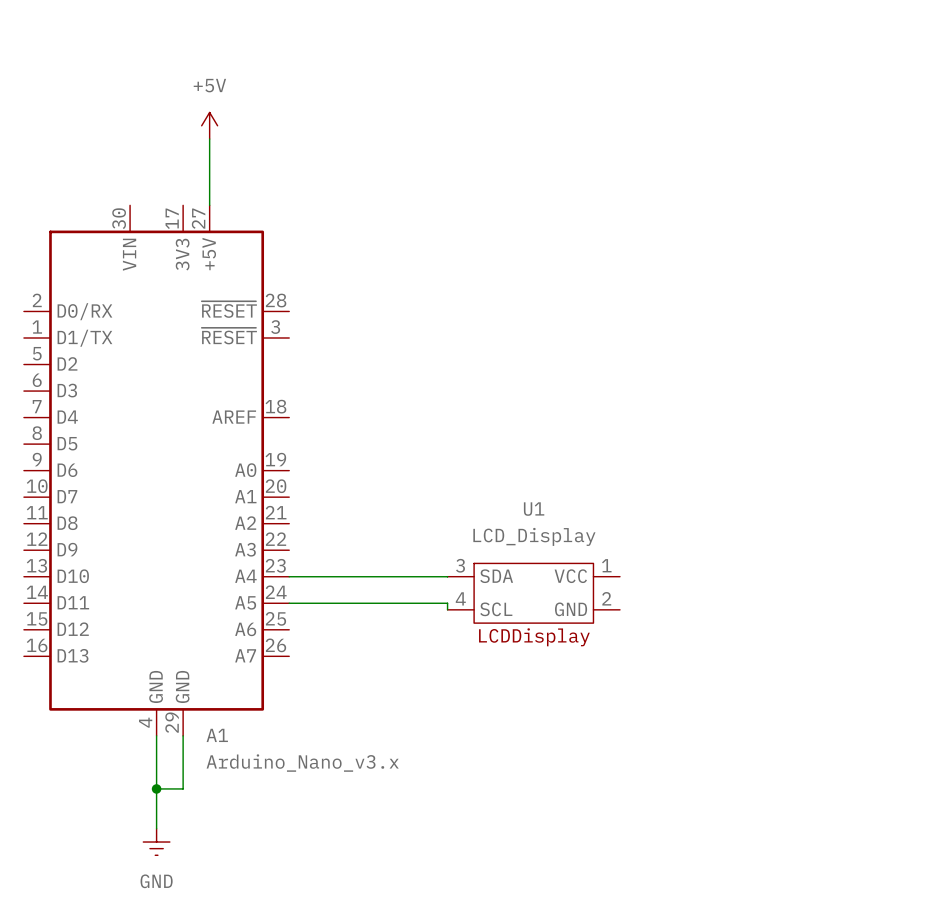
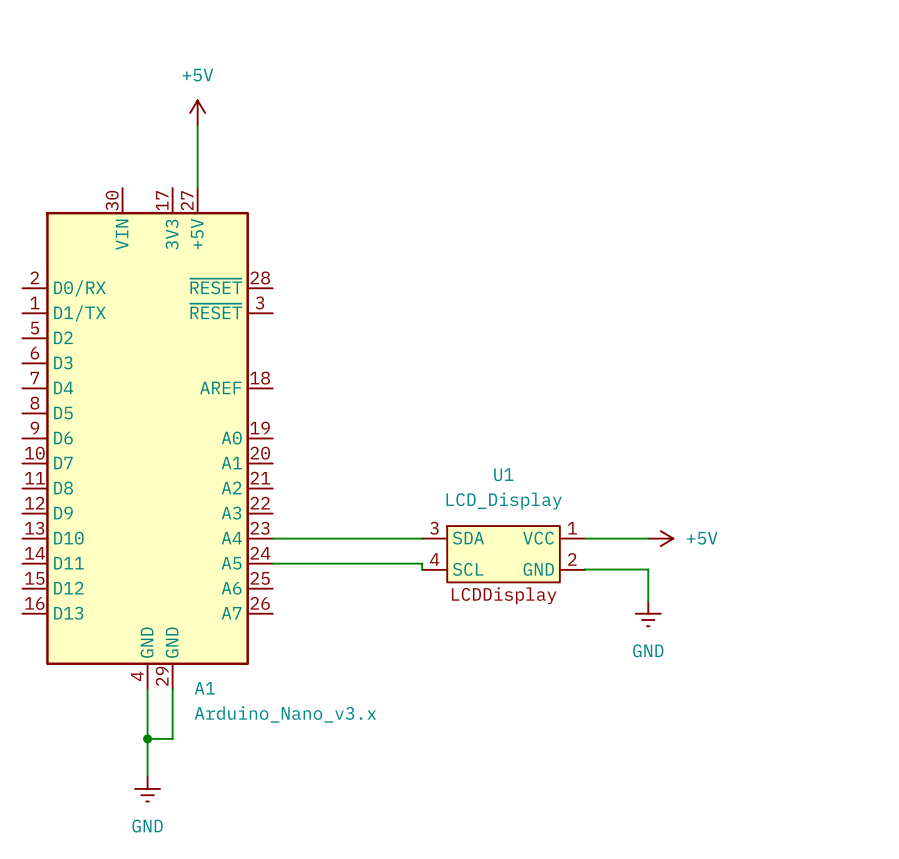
wire: none -> (585, 538) (648, 538)
power symbol: none -> +5V (660, 538)
wire: none -> (584, 569) (648, 569) (648, 601)
power symbol: none -> GND (648, 613)

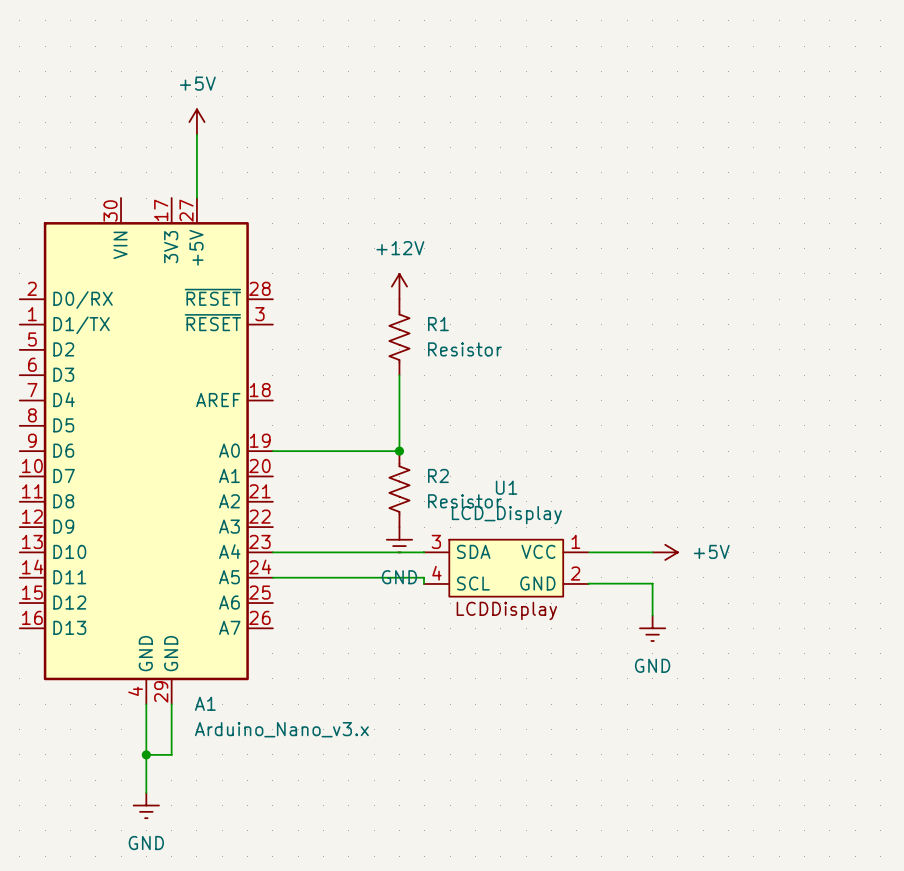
power symbol: none -> +12V (399, 286)
R1: none -> Resistor (399, 337)
wire: none -> (399, 375) (399, 451) (272, 451)
junction: none -> (399, 451)
R2: none -> Resistor (399, 489)
power symbol: none -> GND (399, 539)

